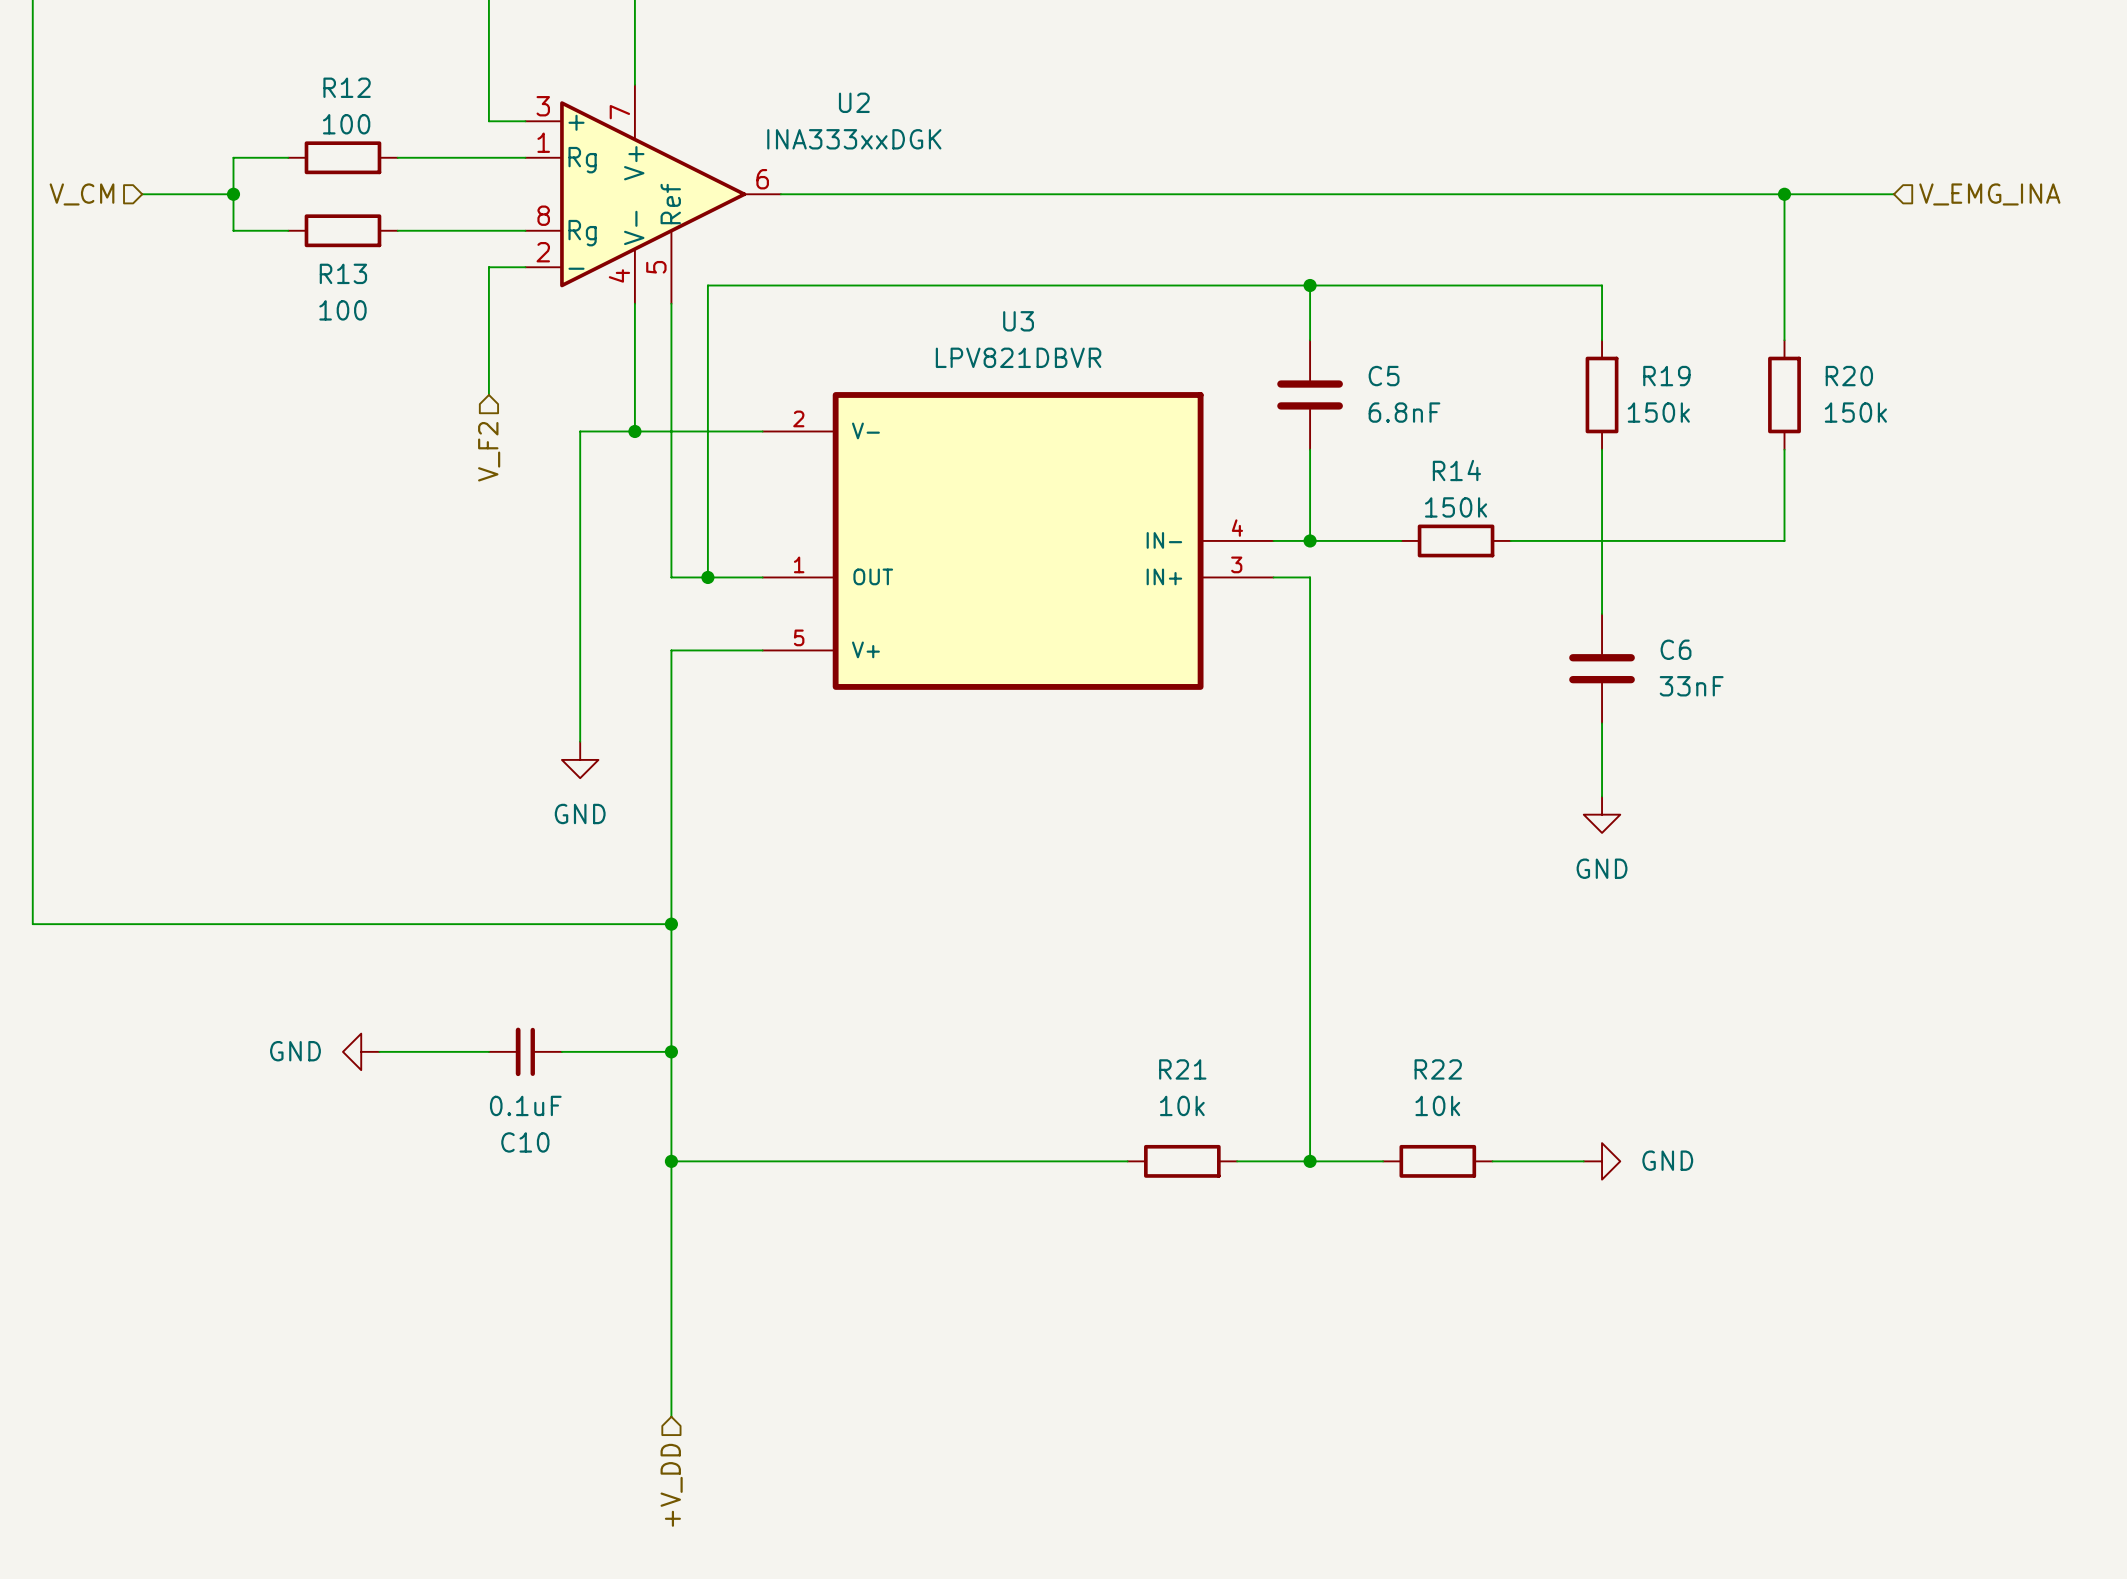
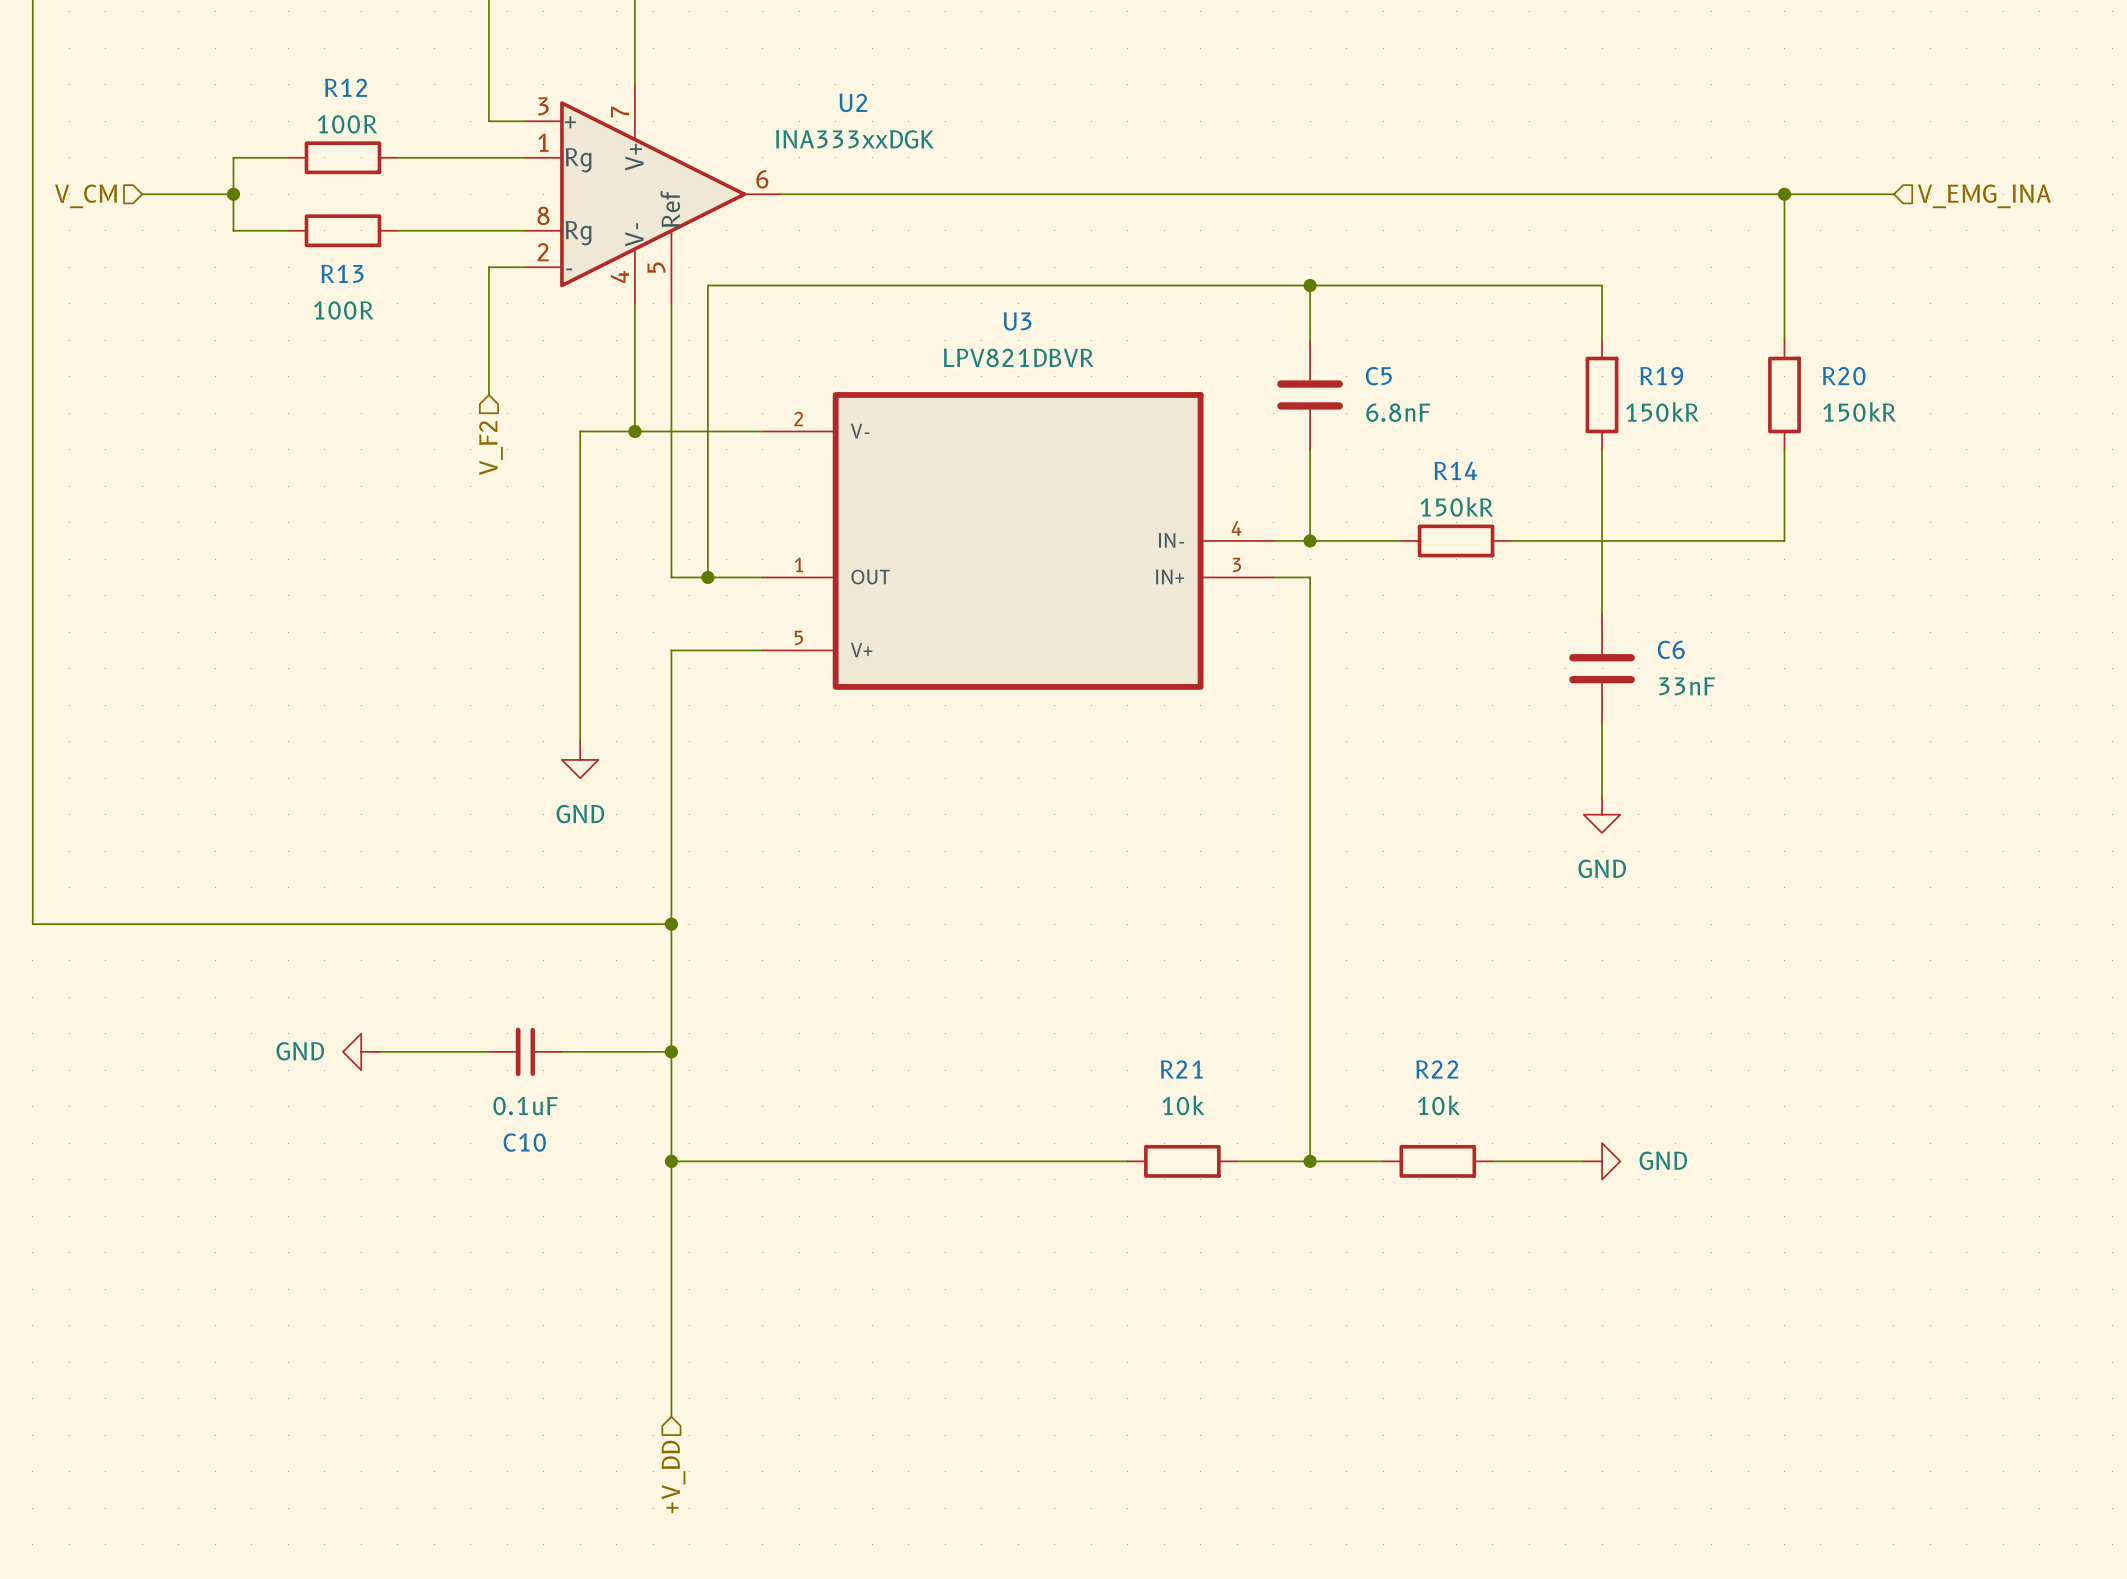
R12 value: 100 (346, 124) -> 100R (347, 124)
R13 value: 100 (342, 310) -> 100R (343, 310)
R19 value: 150k (1658, 412) -> 150kR (1662, 412)
R20 value: 150k (1855, 412) -> 150kR (1859, 412)
R14 value: 150k (1456, 507) -> 150kR (1456, 506)

